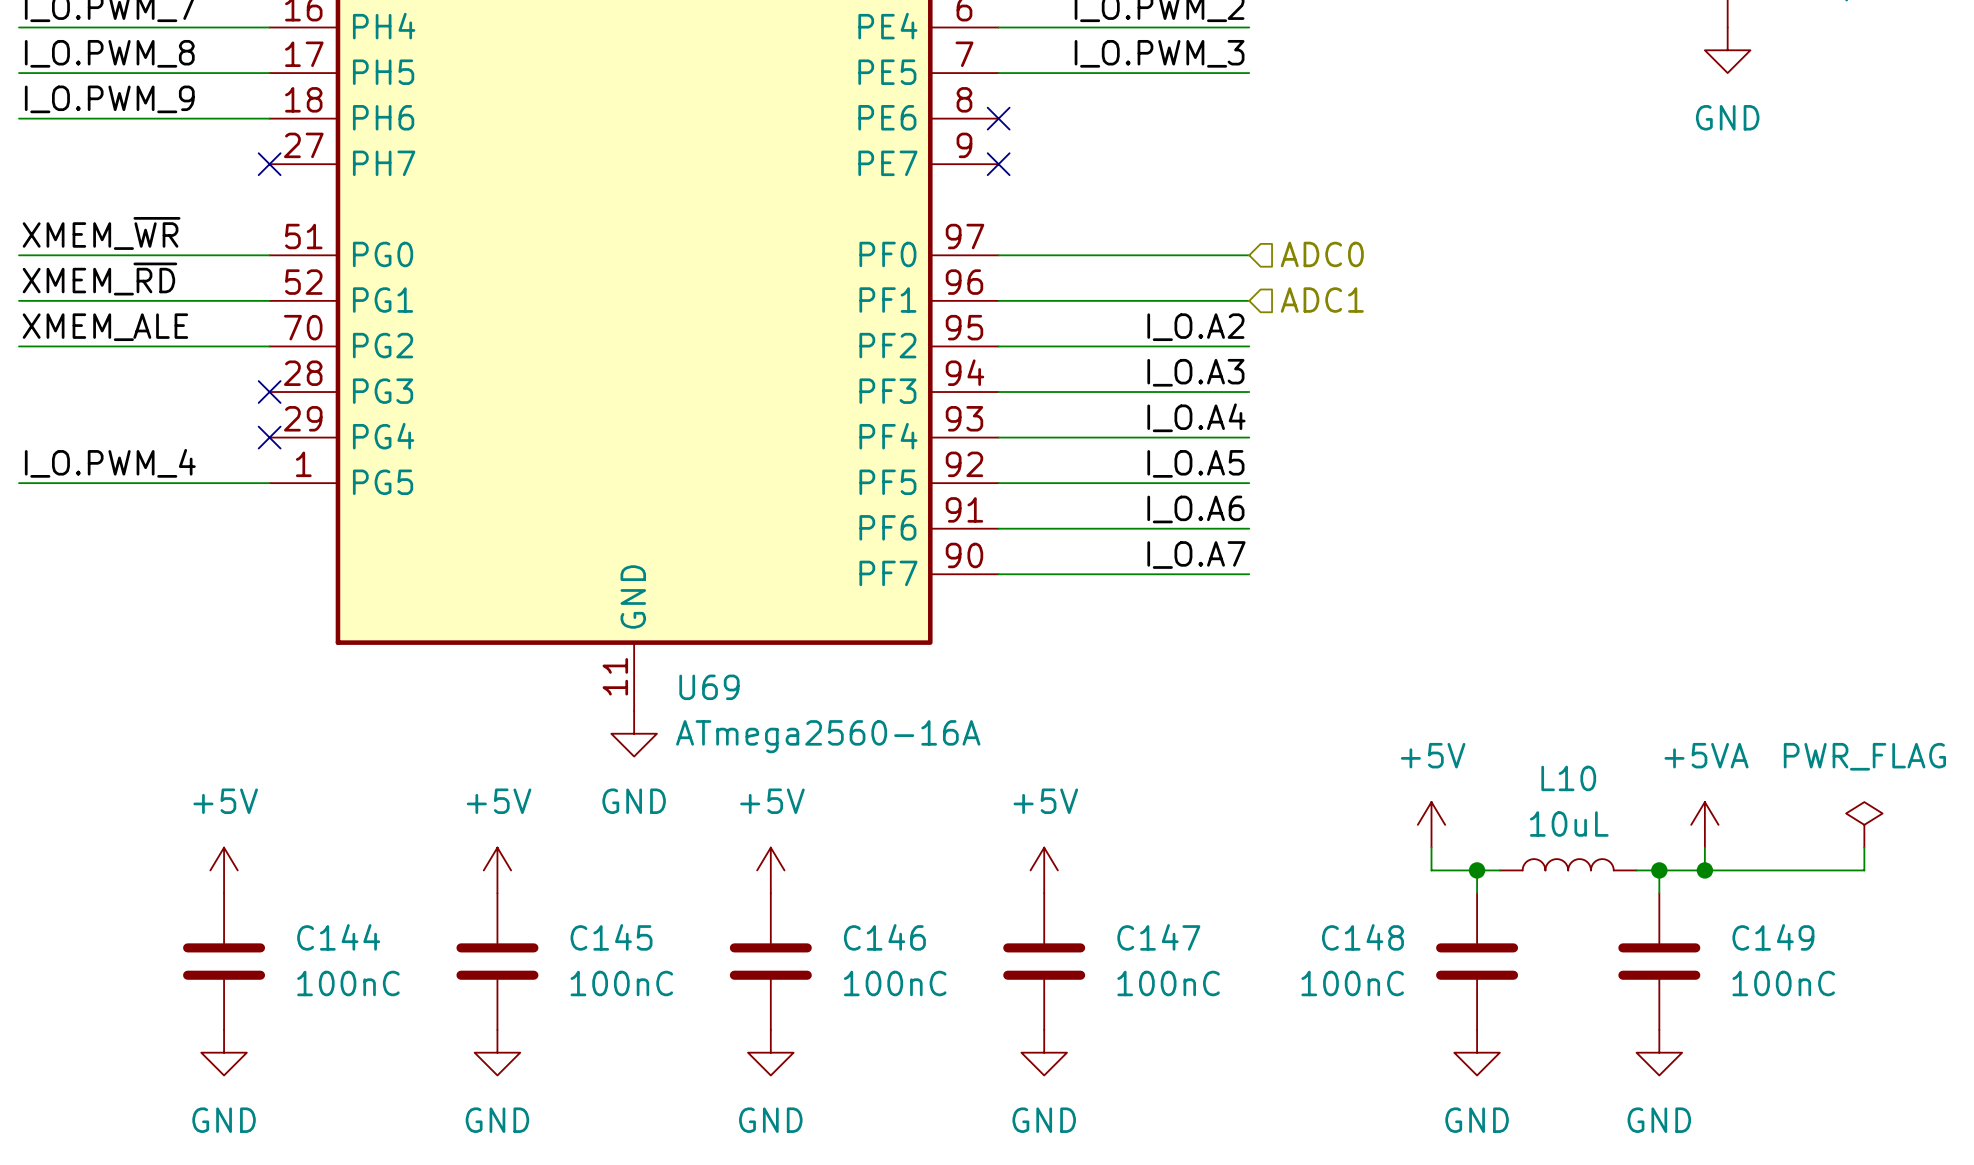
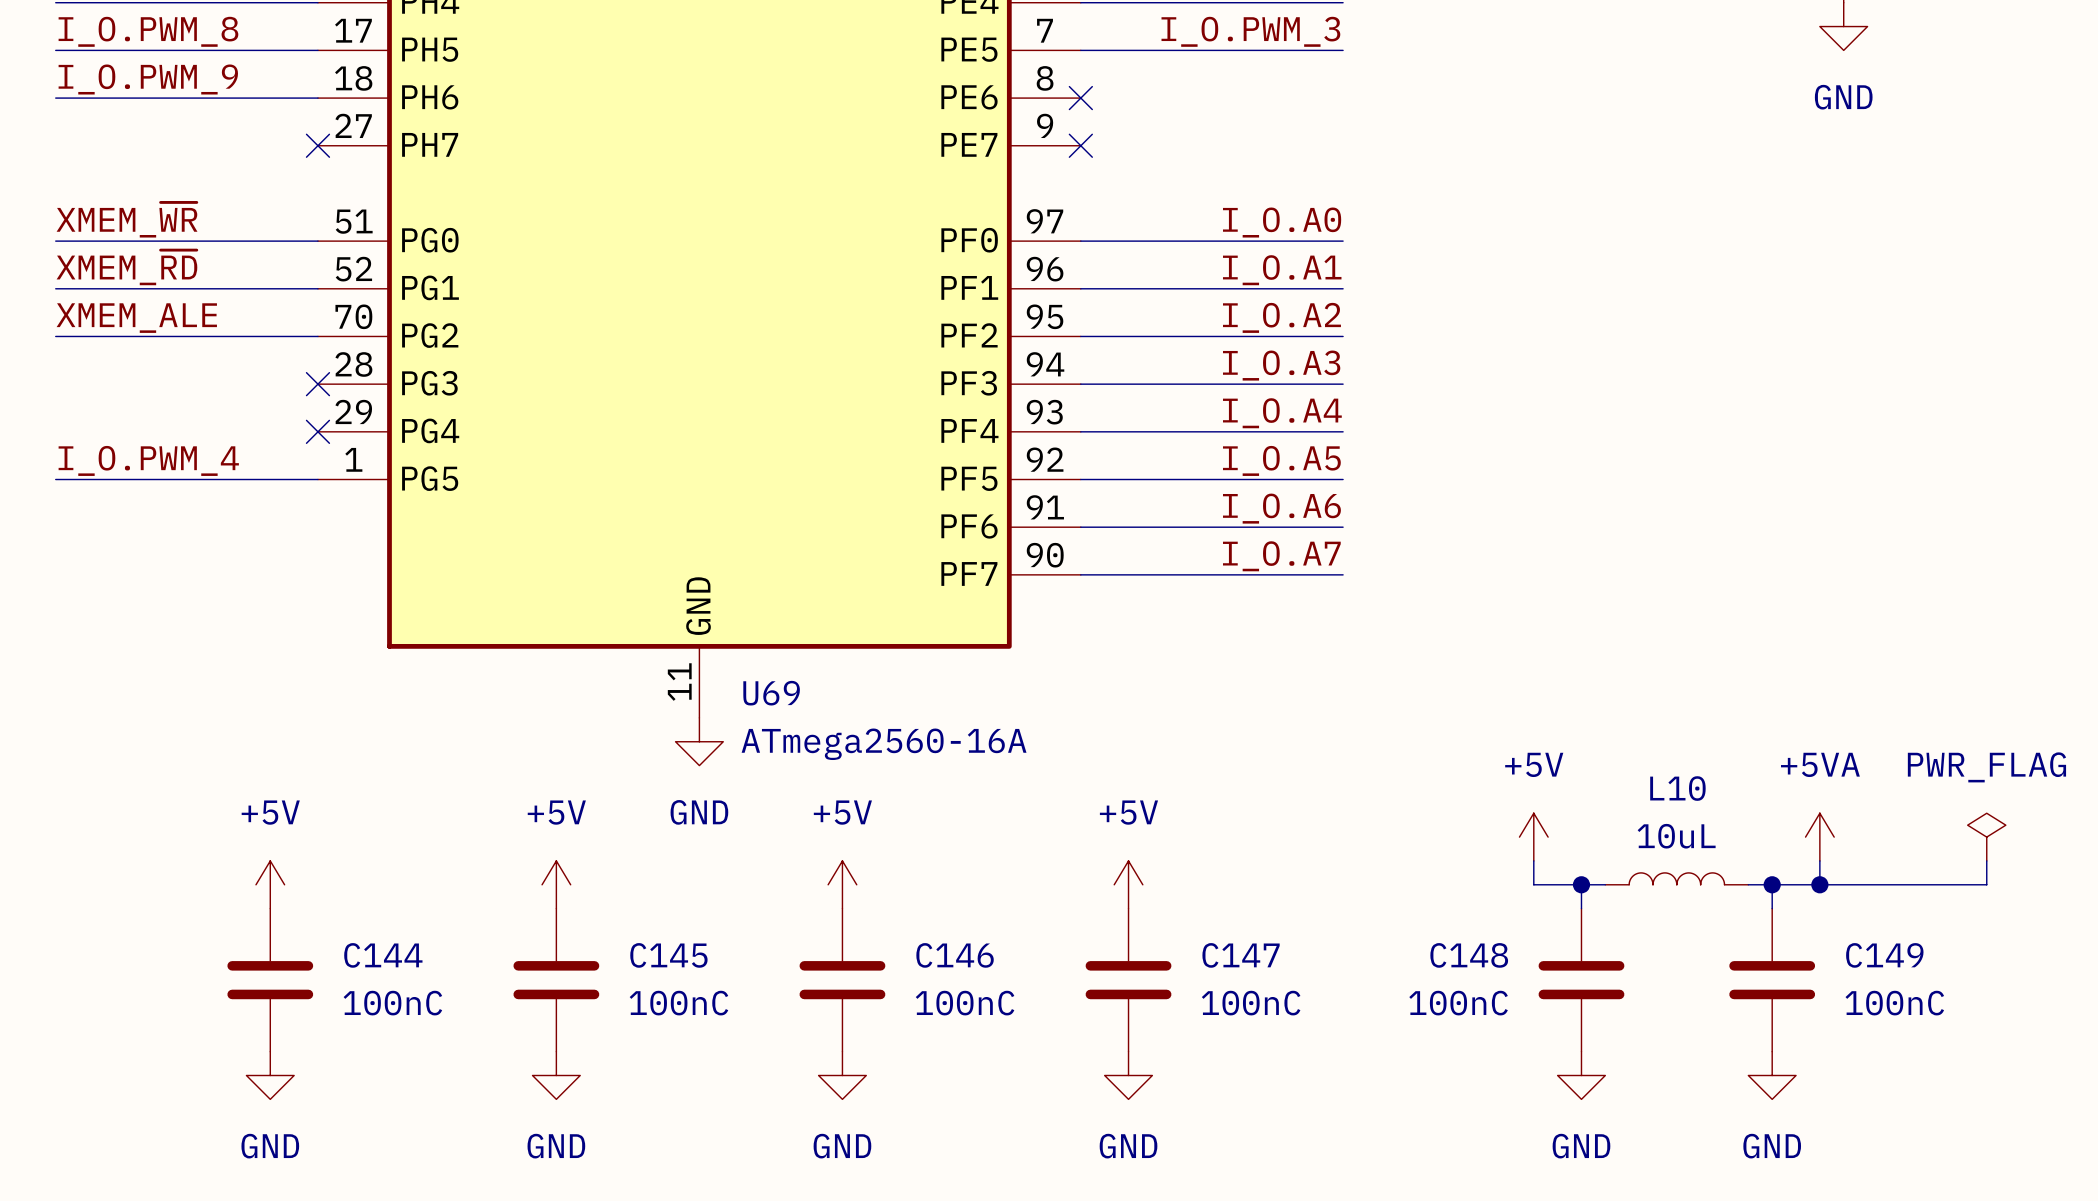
label: none -> I_O.A0 (1282, 222)
hierarchical label: ADC0 (1322, 254) -> none
label: none -> I_O.A1 (1282, 270)
hierarchical label: ADC1 (1322, 300) -> none

